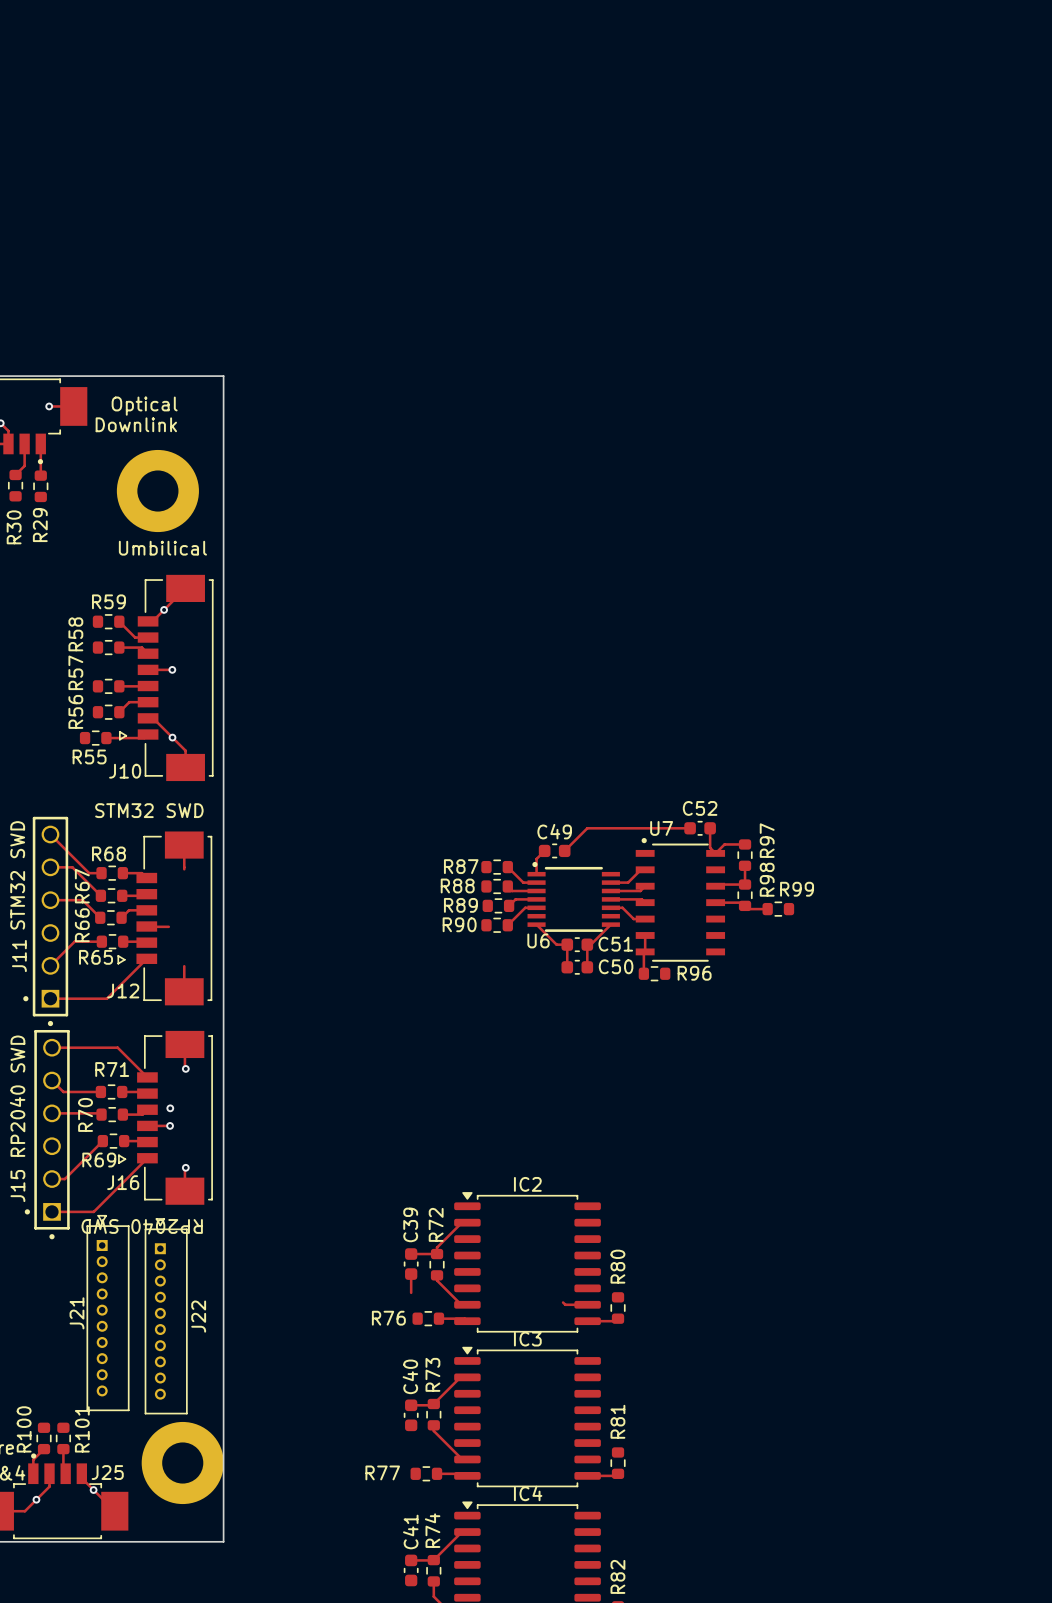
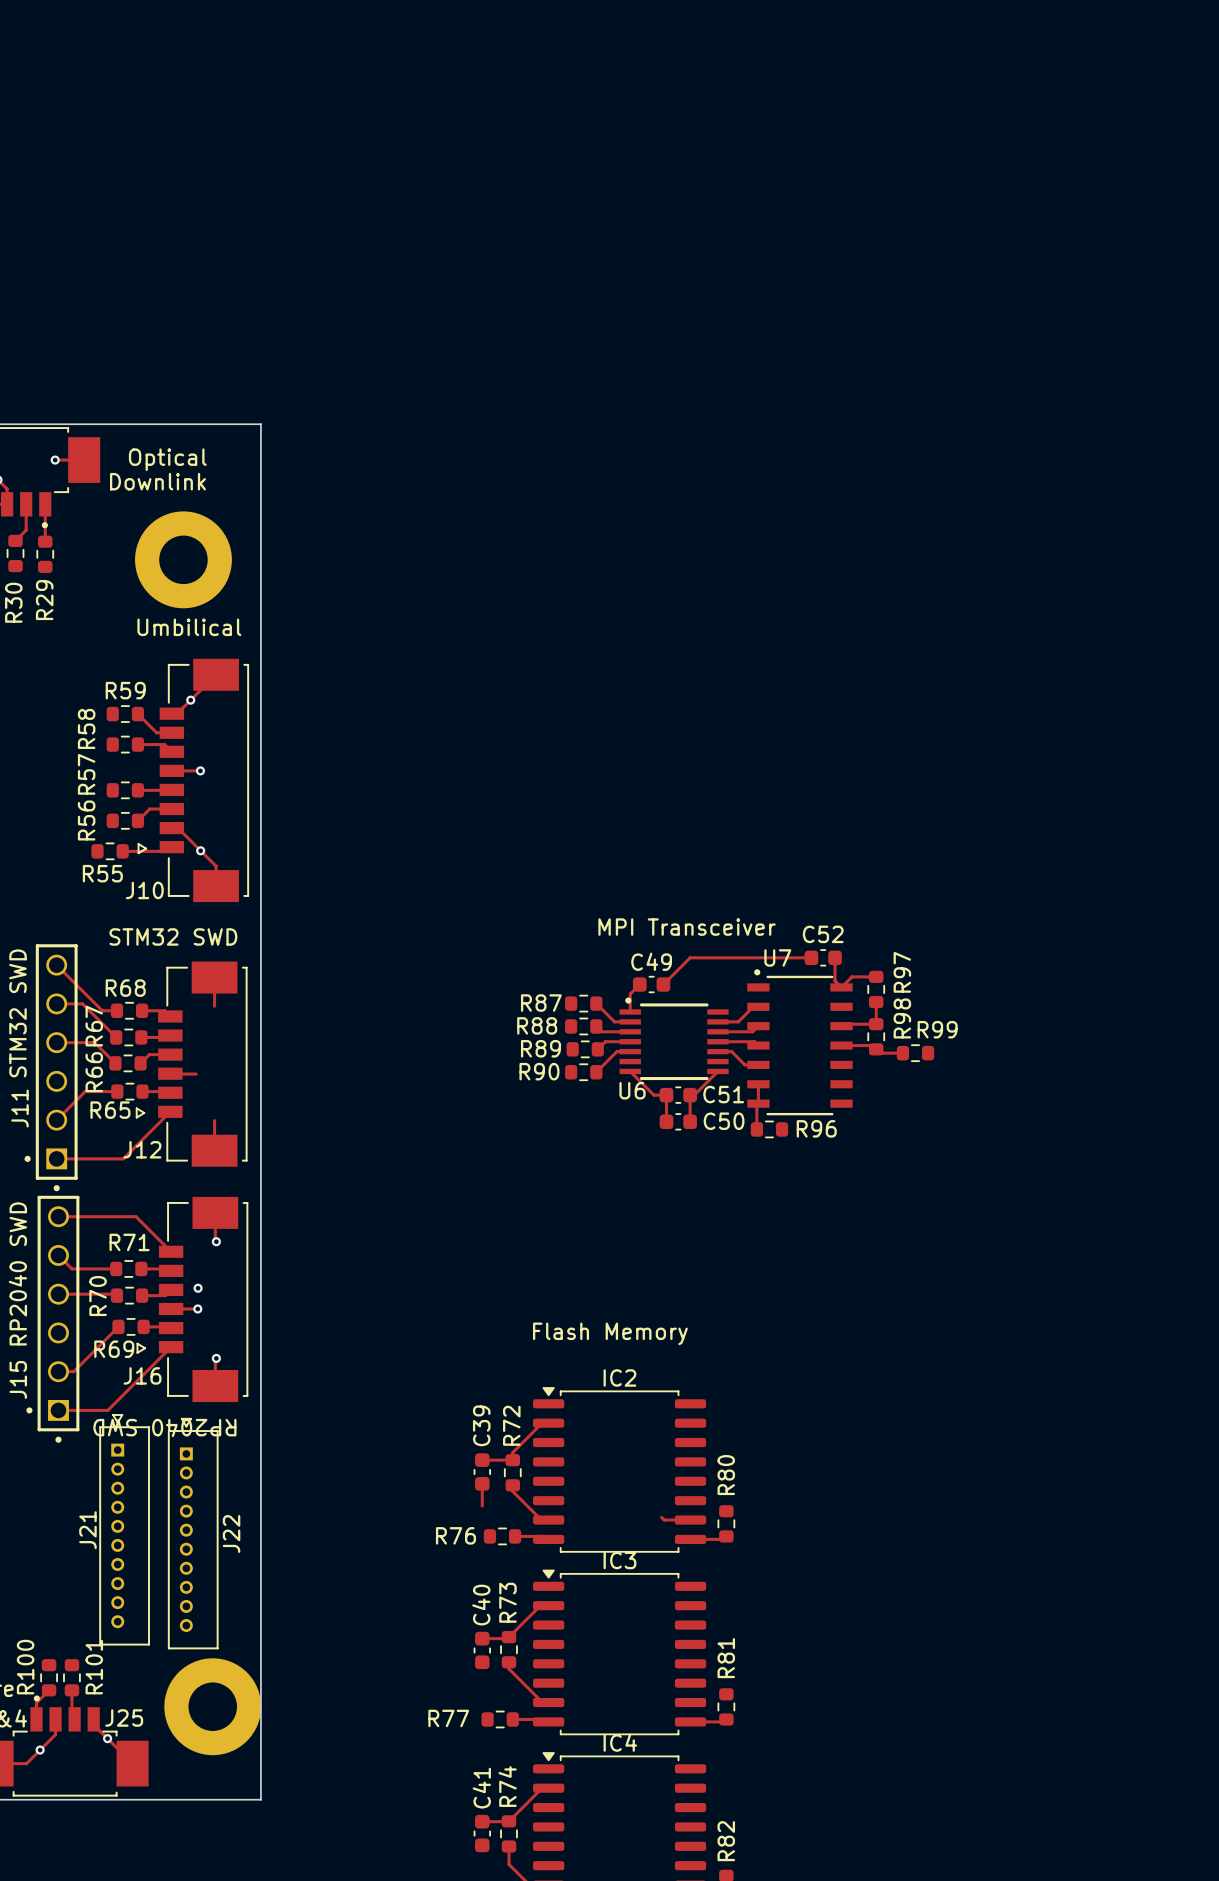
text: none -> MPI Transceiver (687, 927)
text: none -> Flash Memory (610, 1333)

